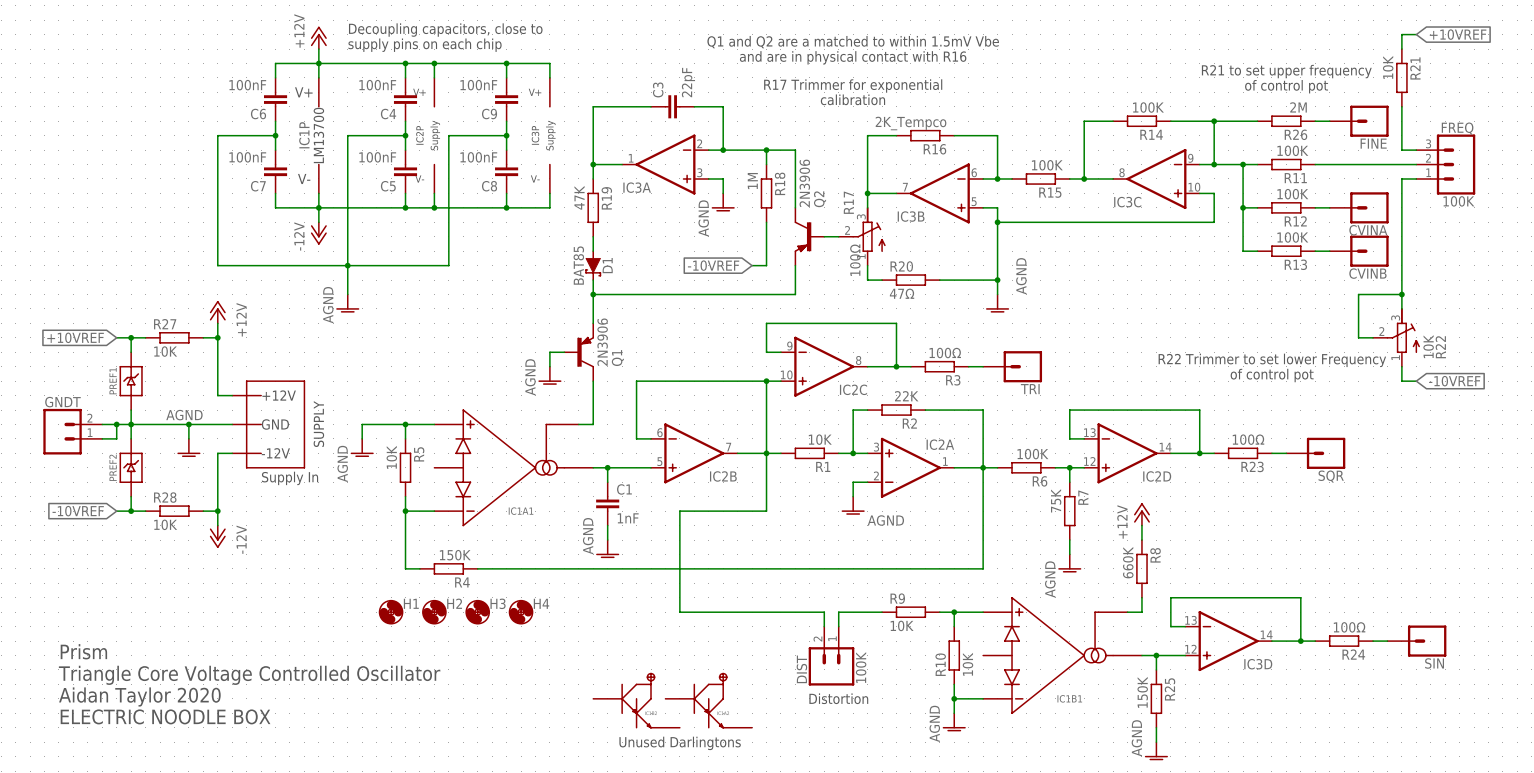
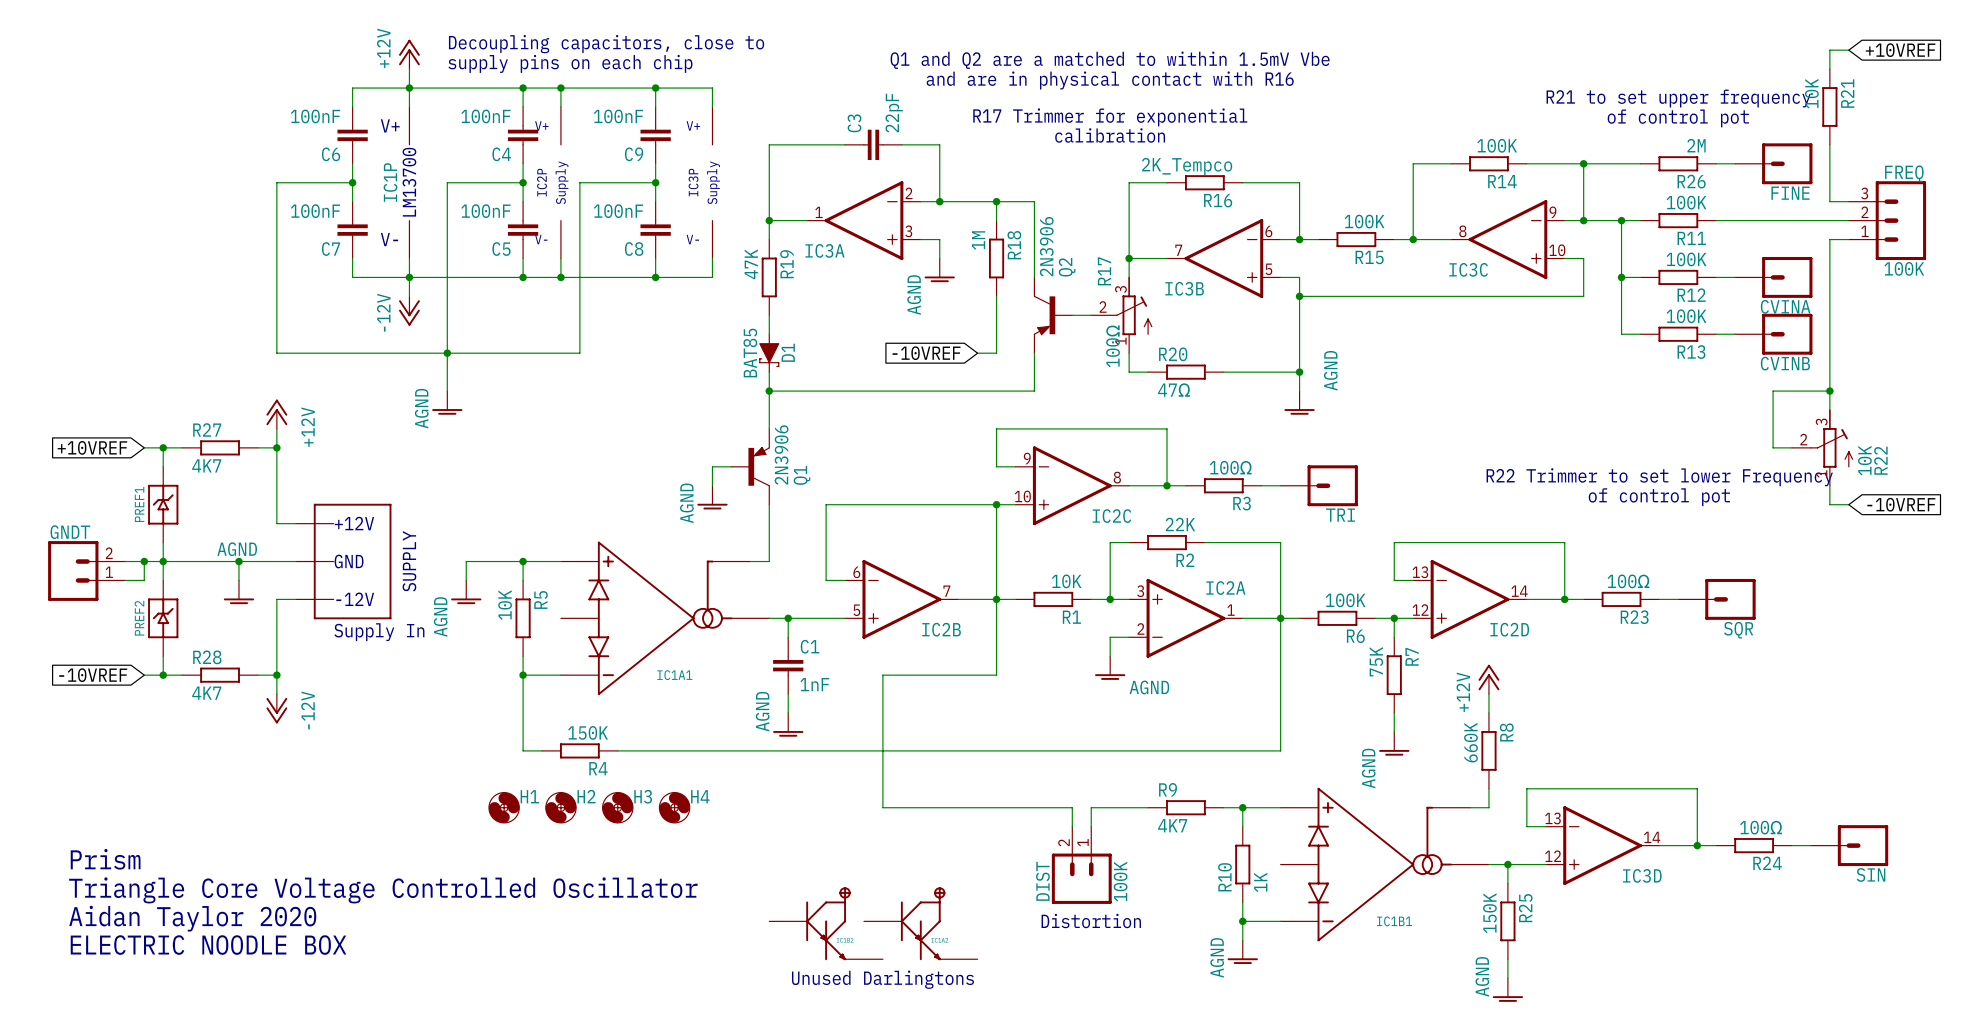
R27 value: 10K (165, 351) -> 4K7 (206, 465)
R28 value: 10K (165, 524) -> 4K7 (206, 693)
R9 value: 10K (902, 625) -> 4K7 (1172, 825)
R10 value: 10K (967, 664) -> 1K (1260, 882)

